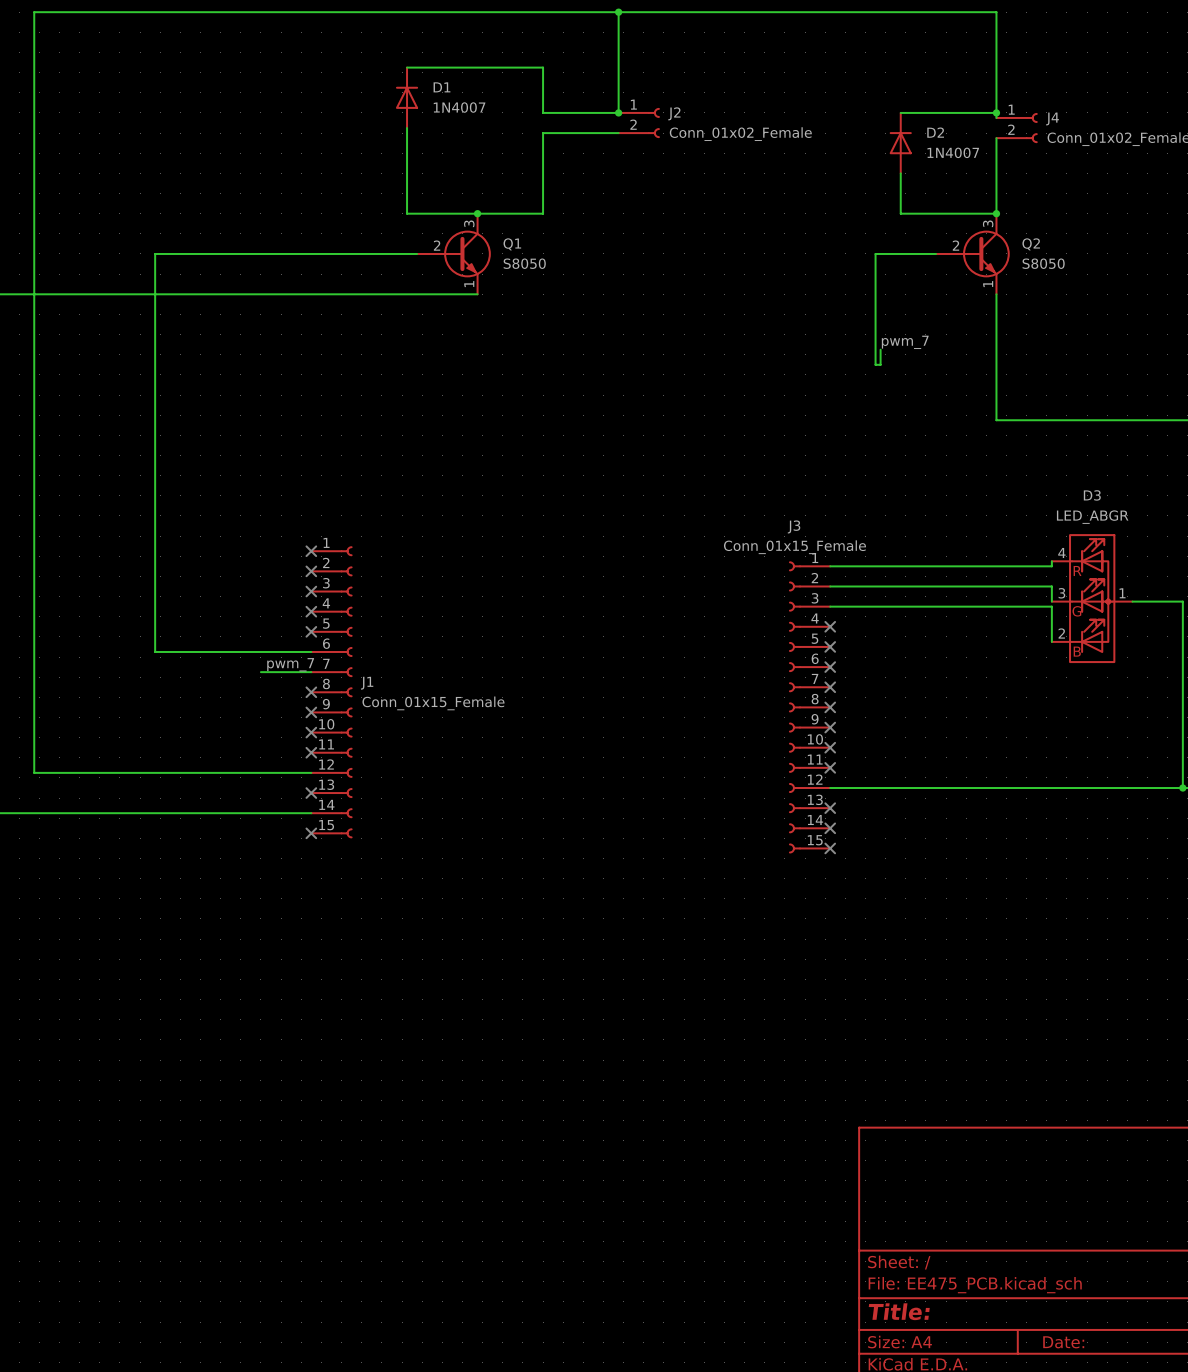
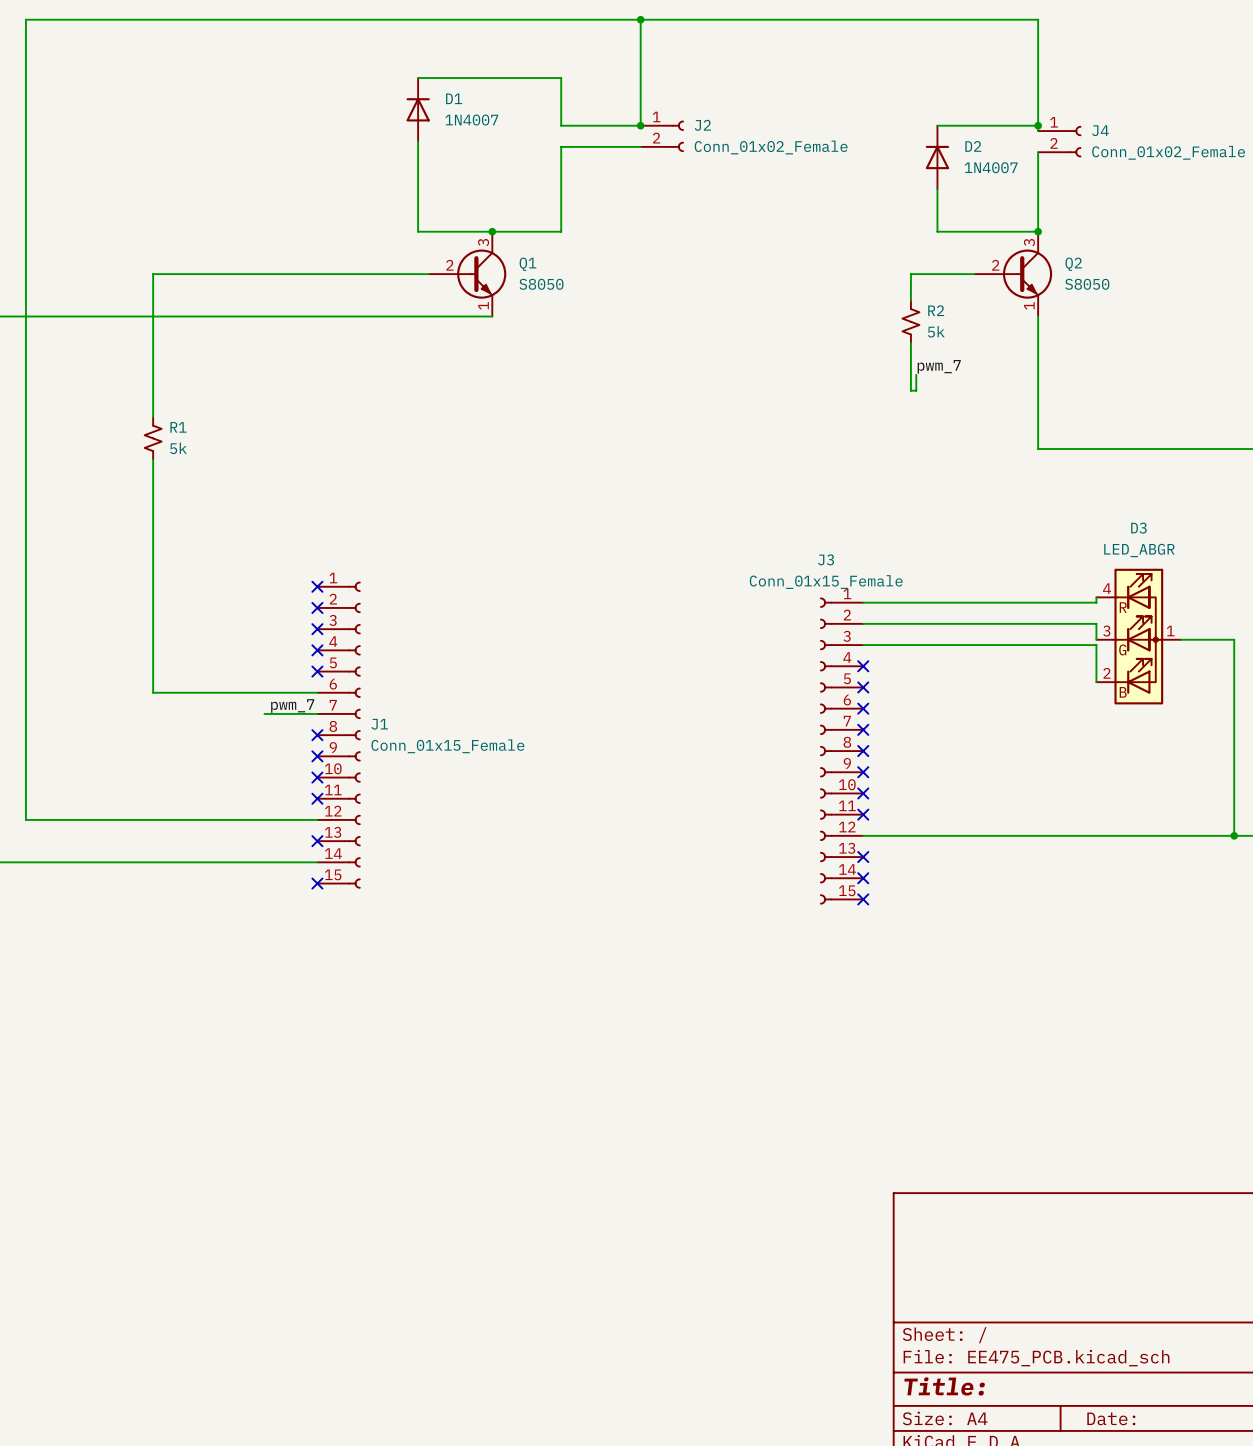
R2: none -> 5k (910, 321)
R1: none -> 5k (153, 438)

